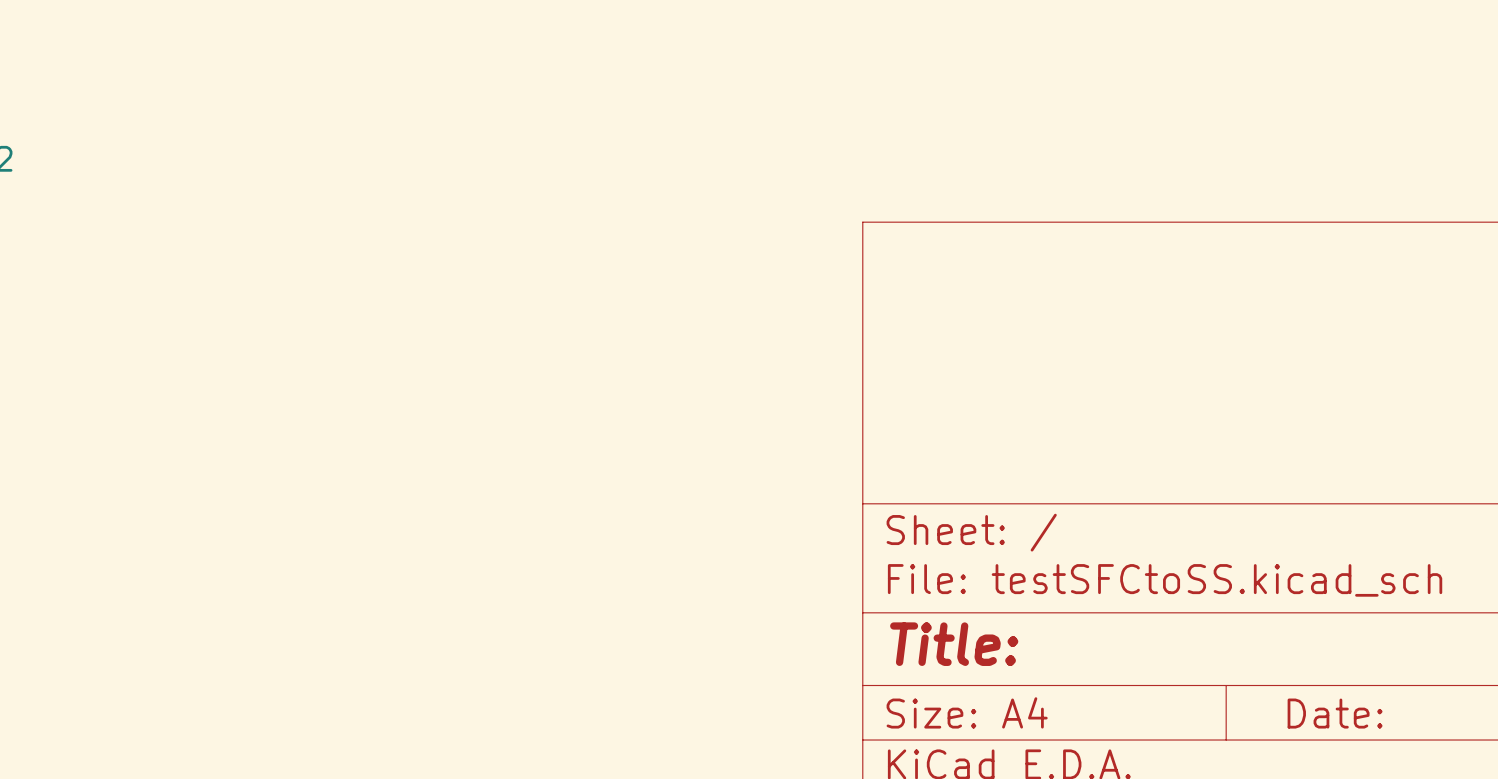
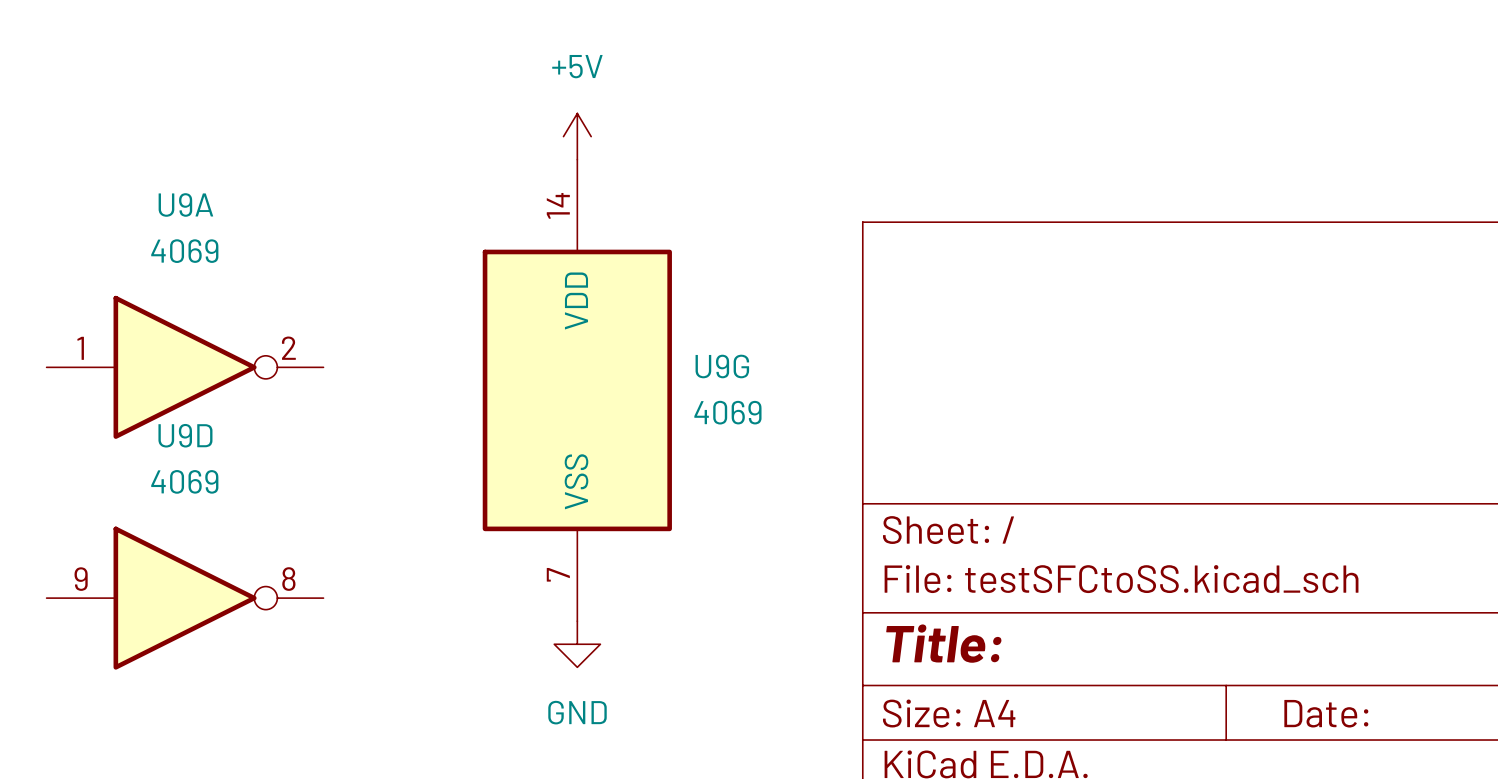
power symbol: none -> +5V (577, 136)
U9A: none -> 4069 (185, 367)
U9G: none -> 4069 (577, 390)
U9D: none -> 4069 (185, 598)
power symbol: none -> GND (577, 644)

